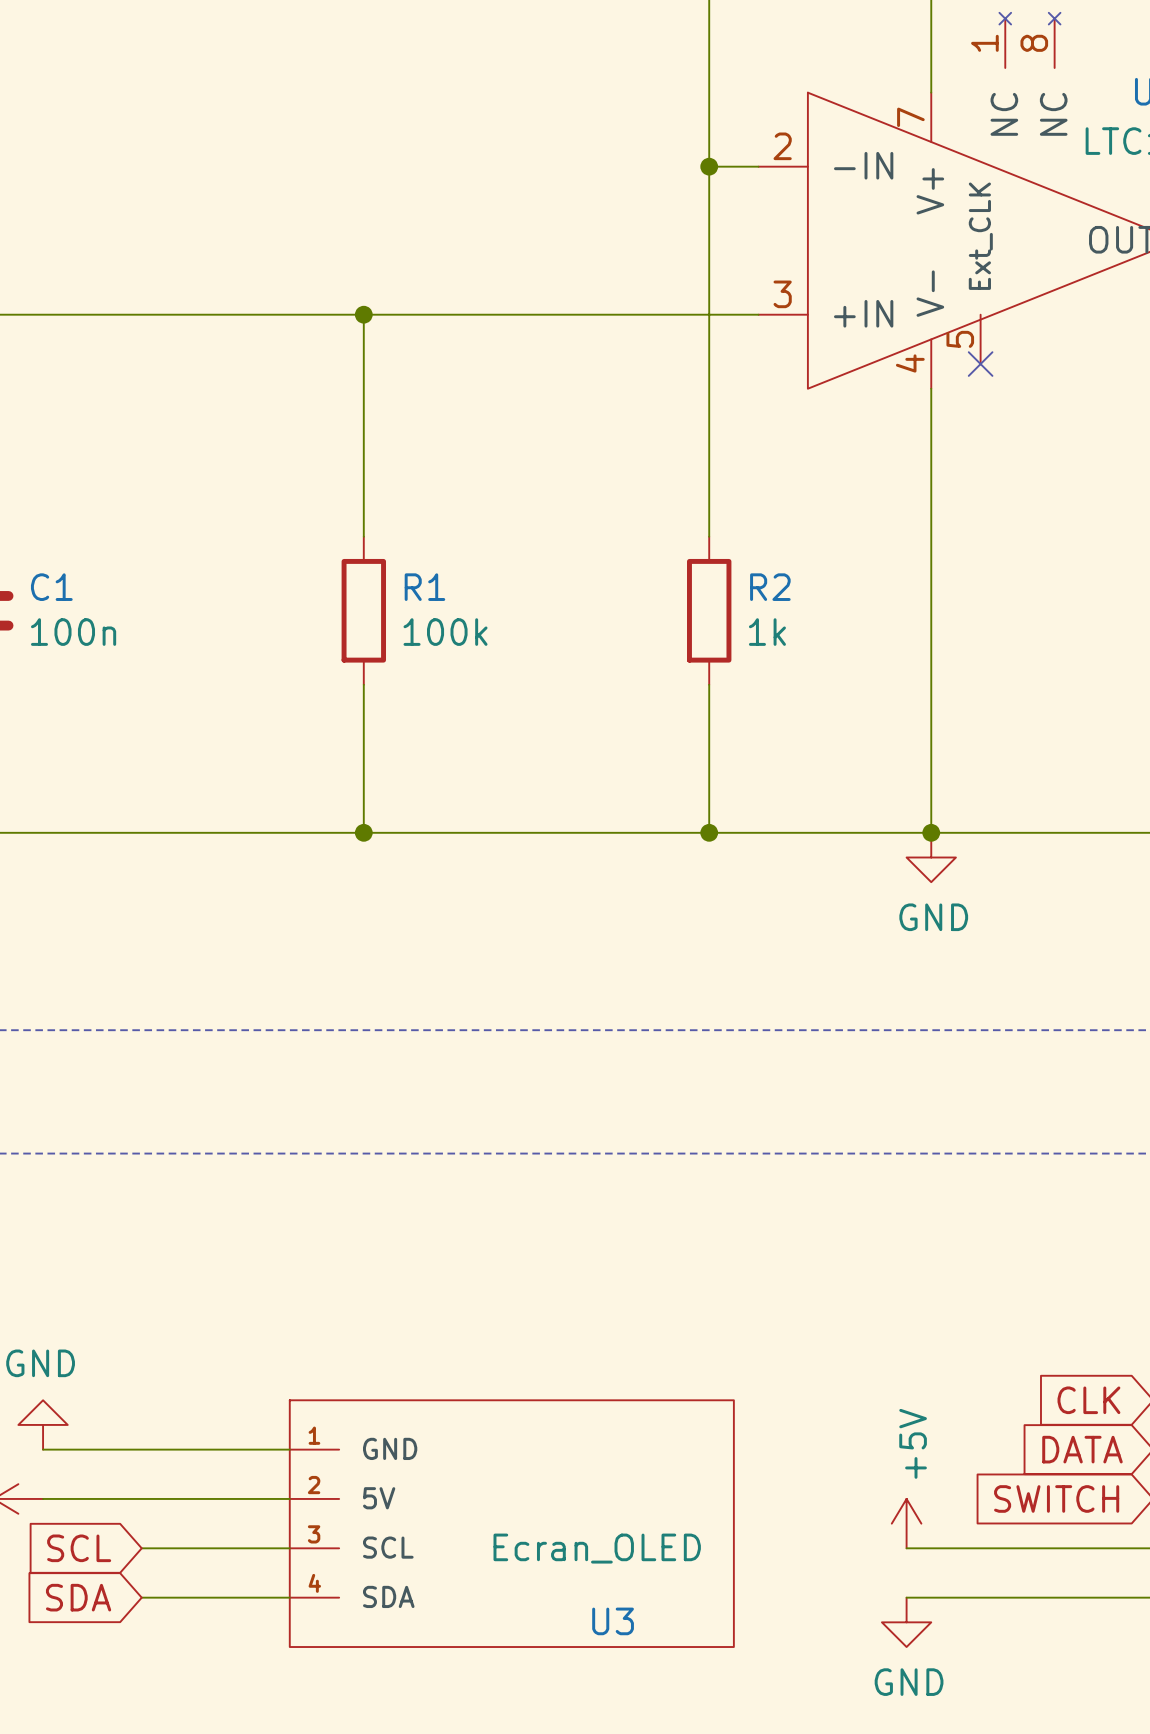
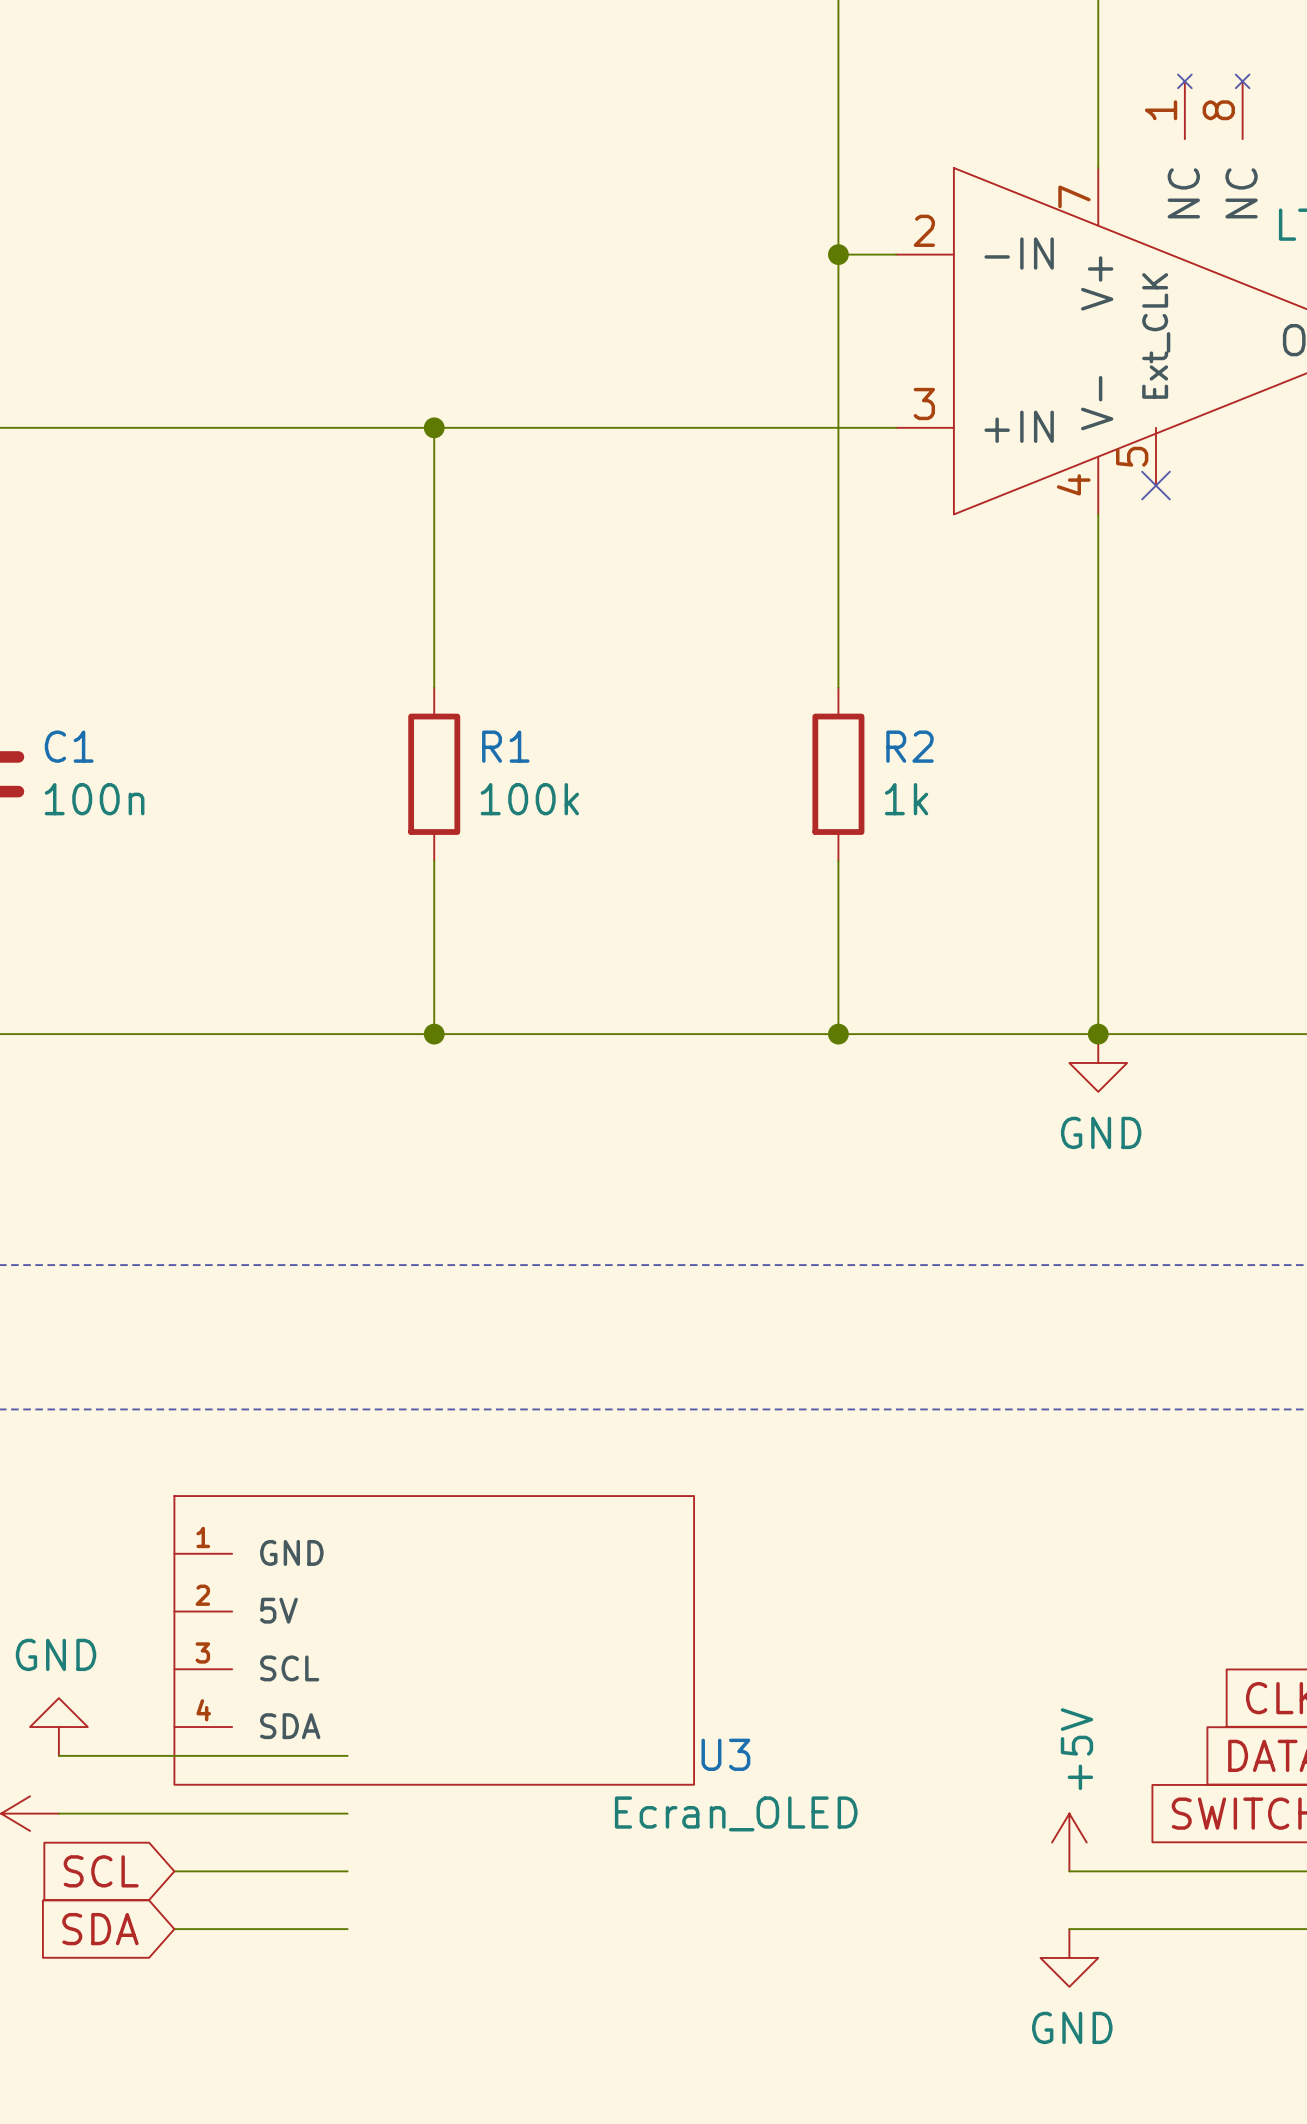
U3 position: (511, 1523) -> (434, 1640)
U3 value position: Ecran_OLED (597, 1548) -> Ecran_OLED (736, 1813)
U3 name position: U3 (613, 1621) -> U3 (725, 1754)

